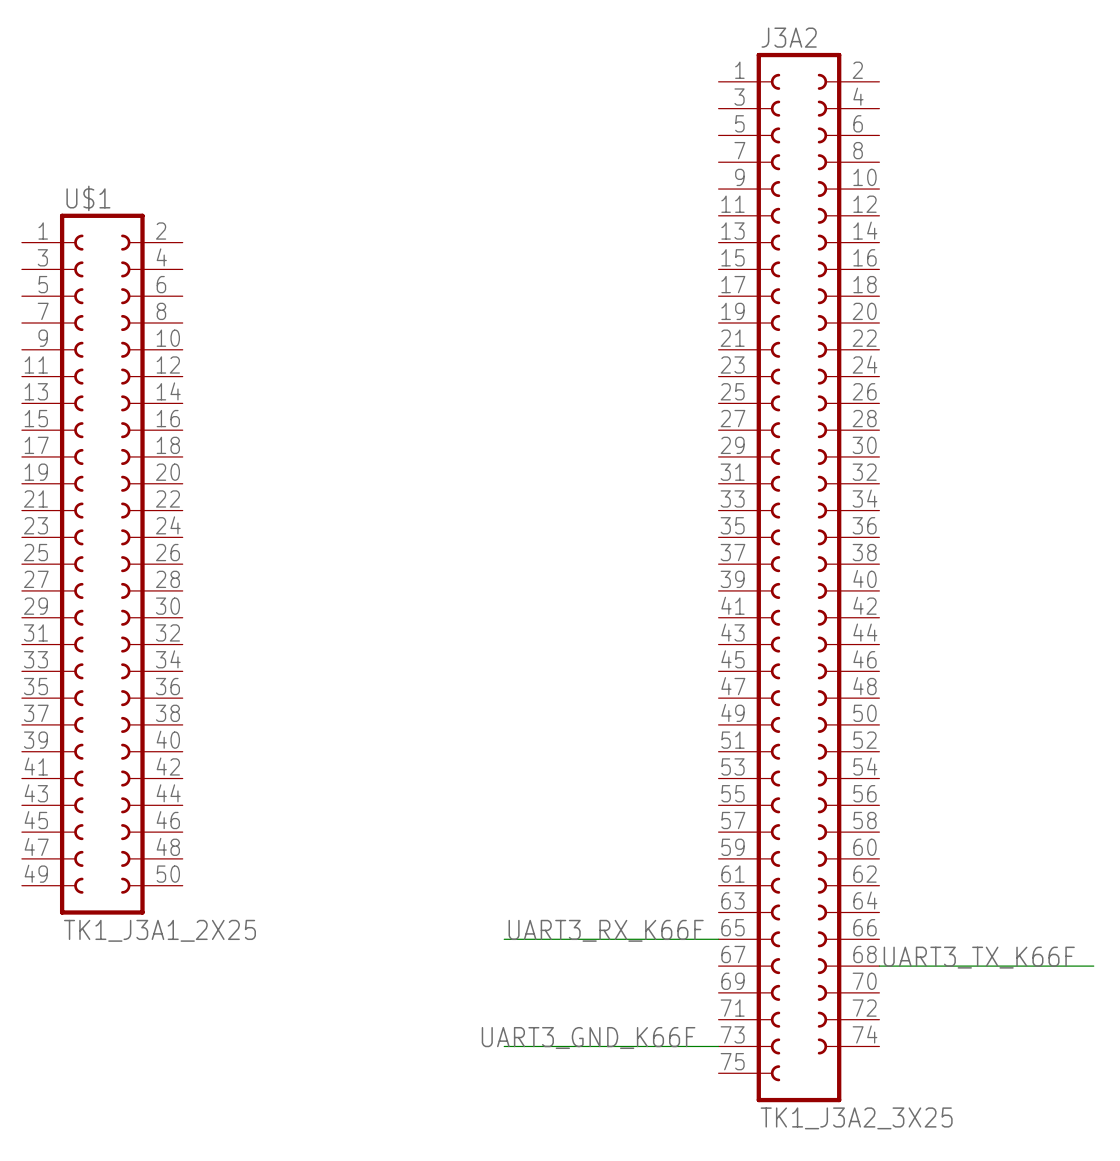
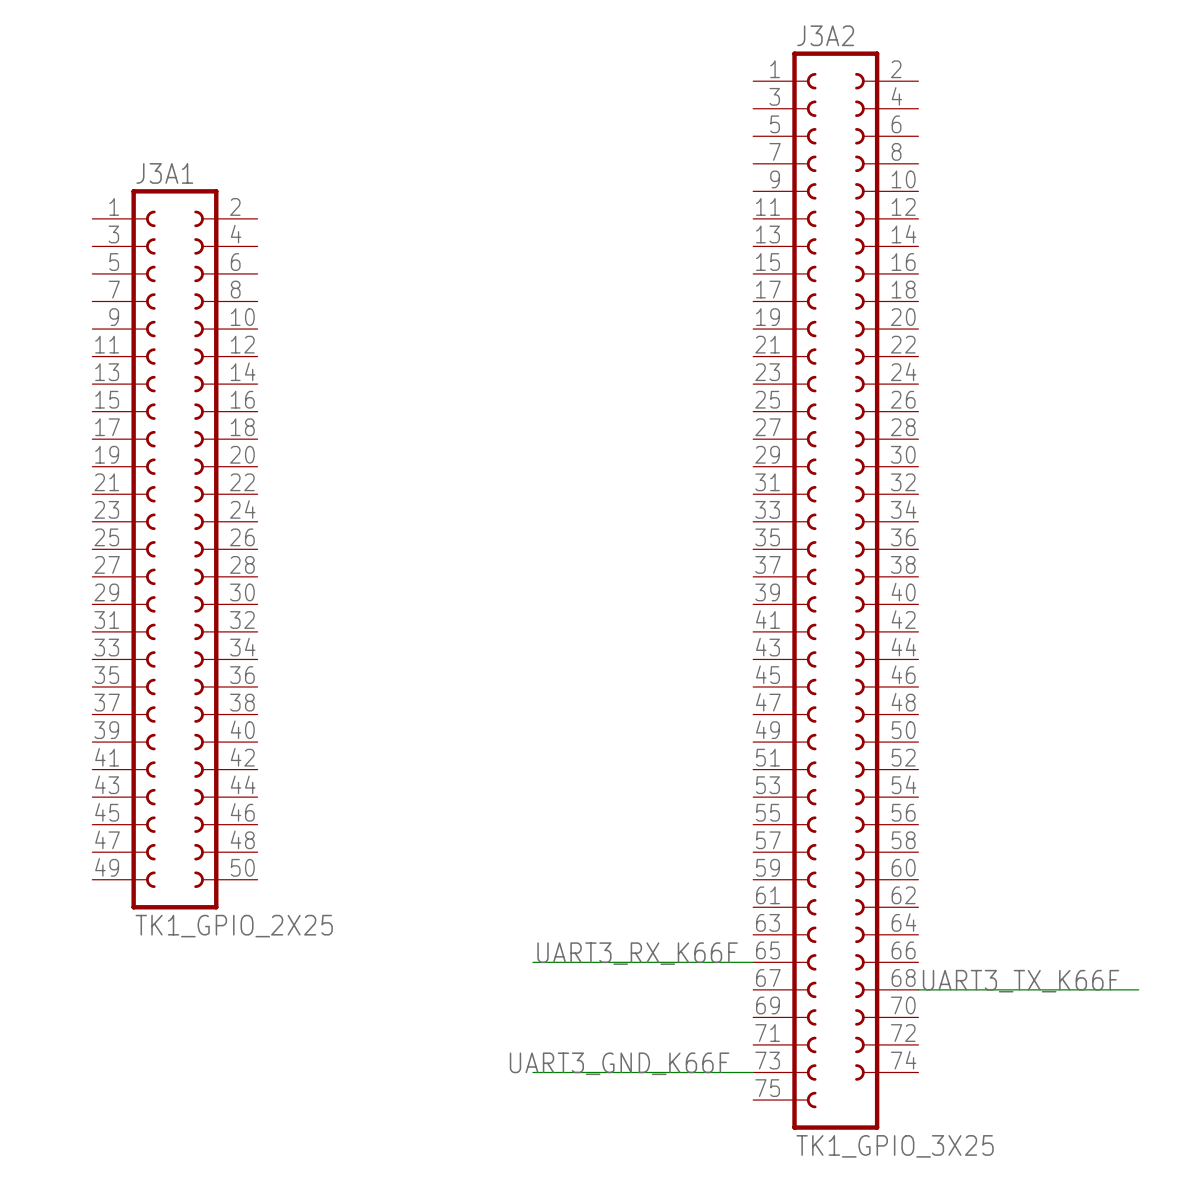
J3A1: none -> TK1_GPIO_2X25 (174, 549)
U$1: TK1_J3A1_2X25 (102, 564) -> none
J3A2 value: TK1_J3A2_3X25 (856, 1118) -> TK1_GPIO_3X25 (895, 1146)

